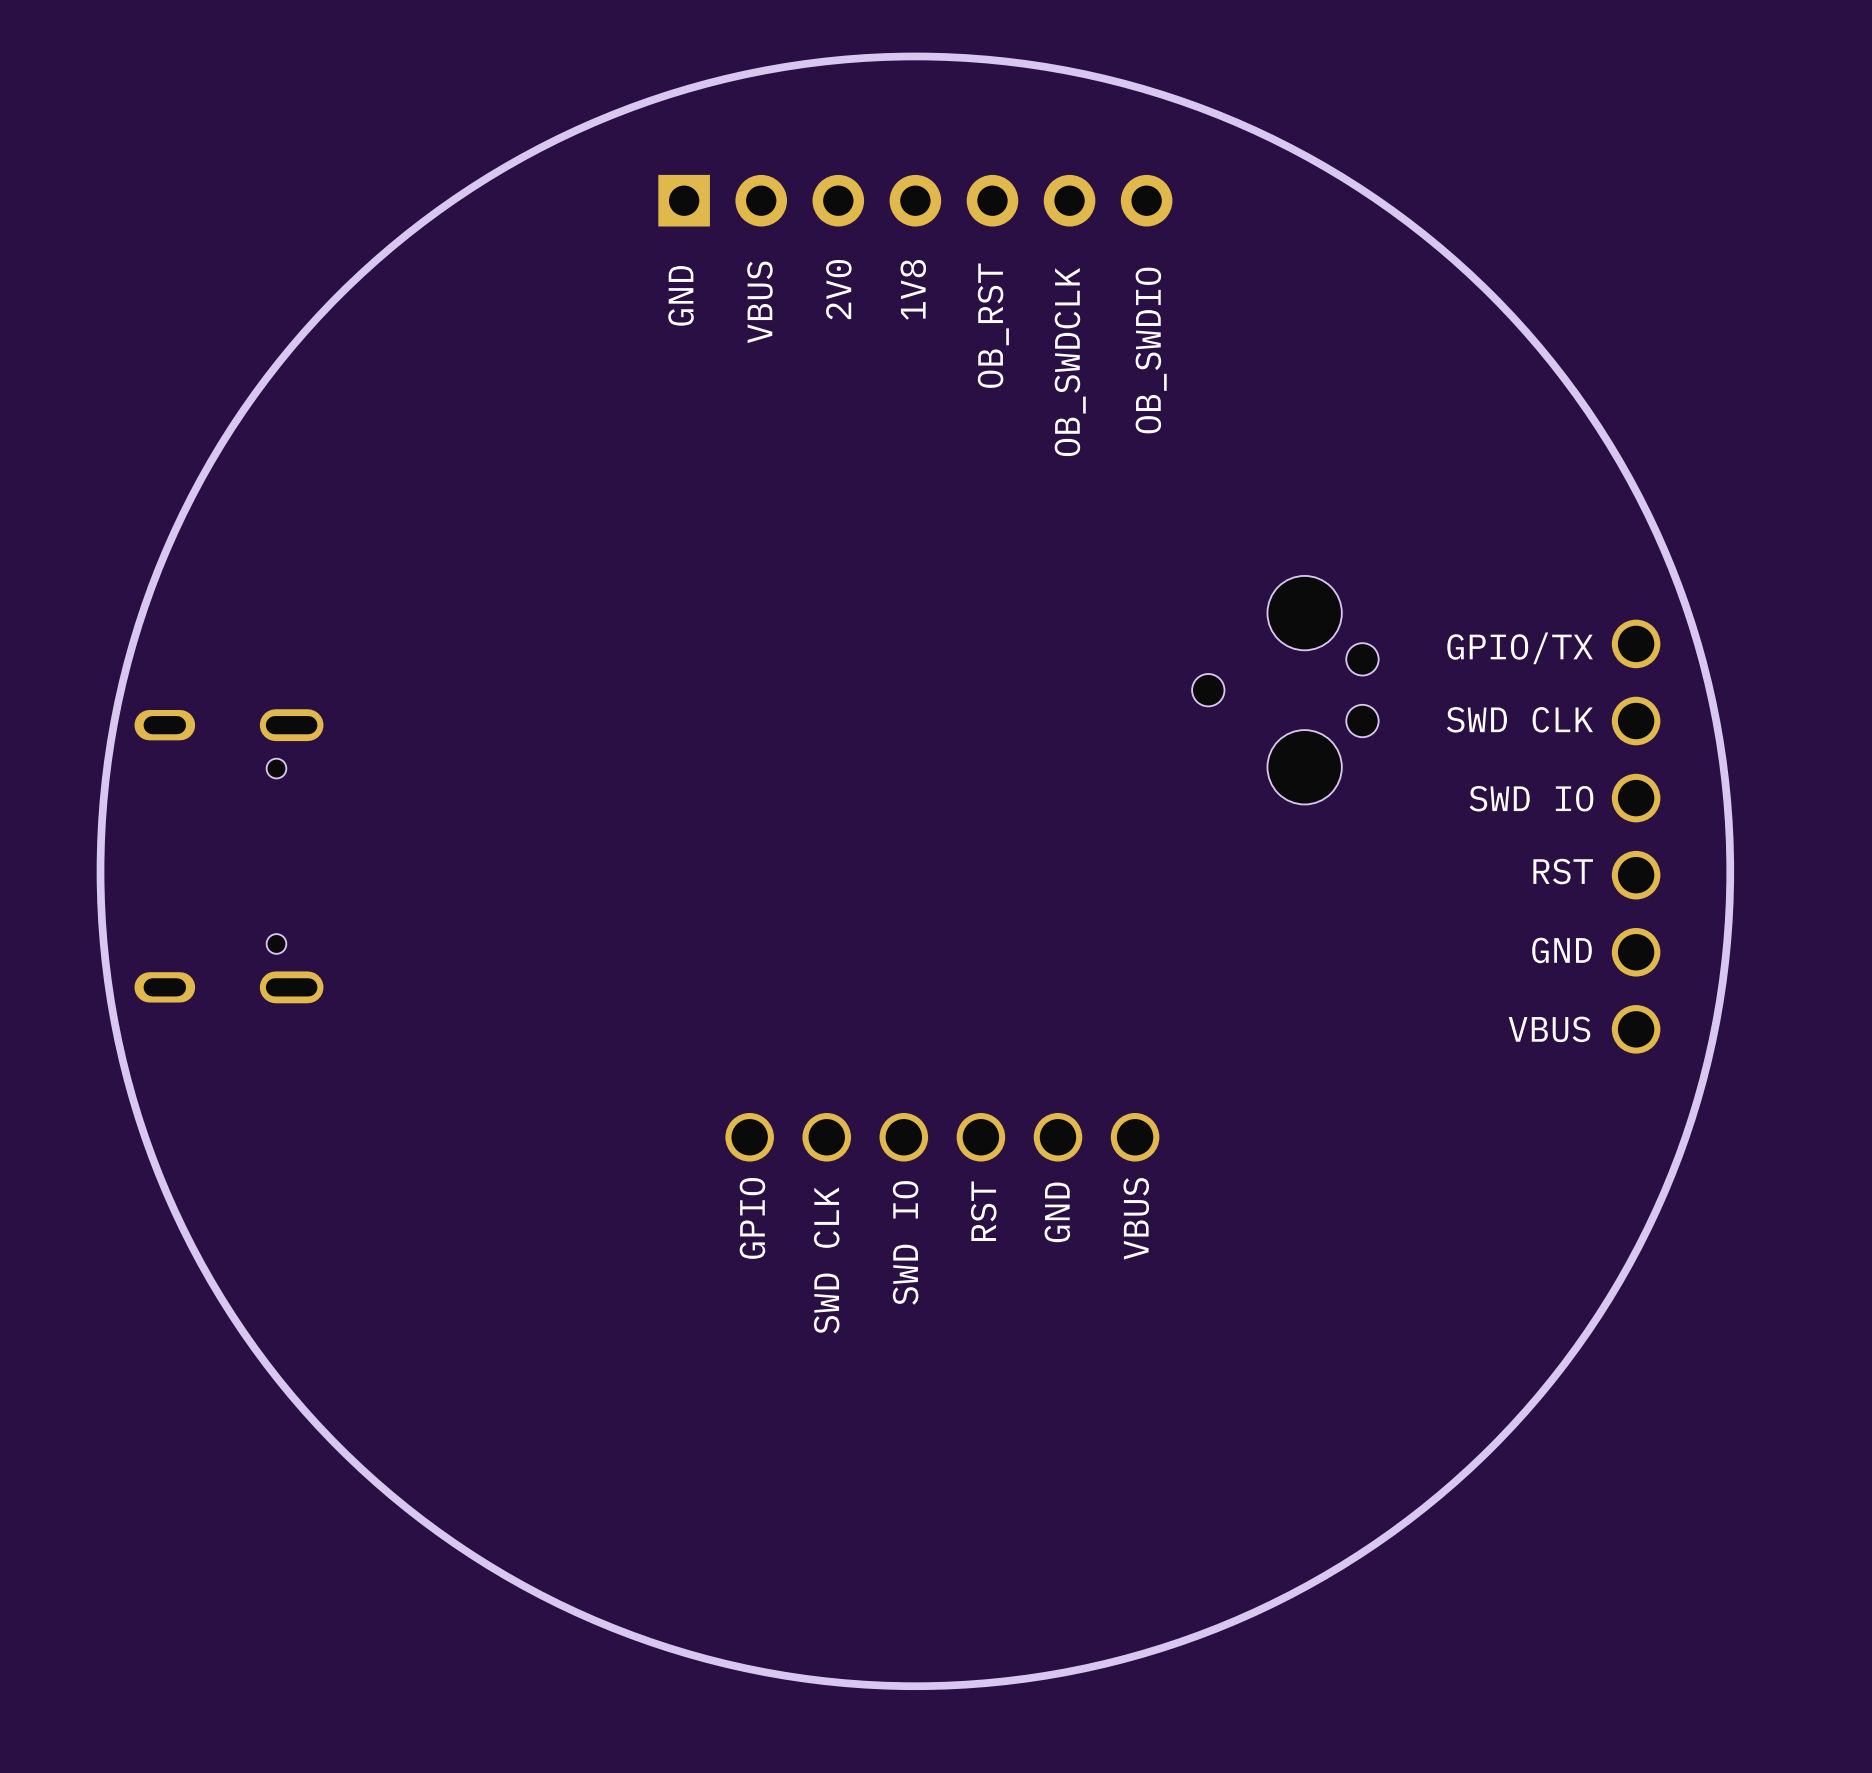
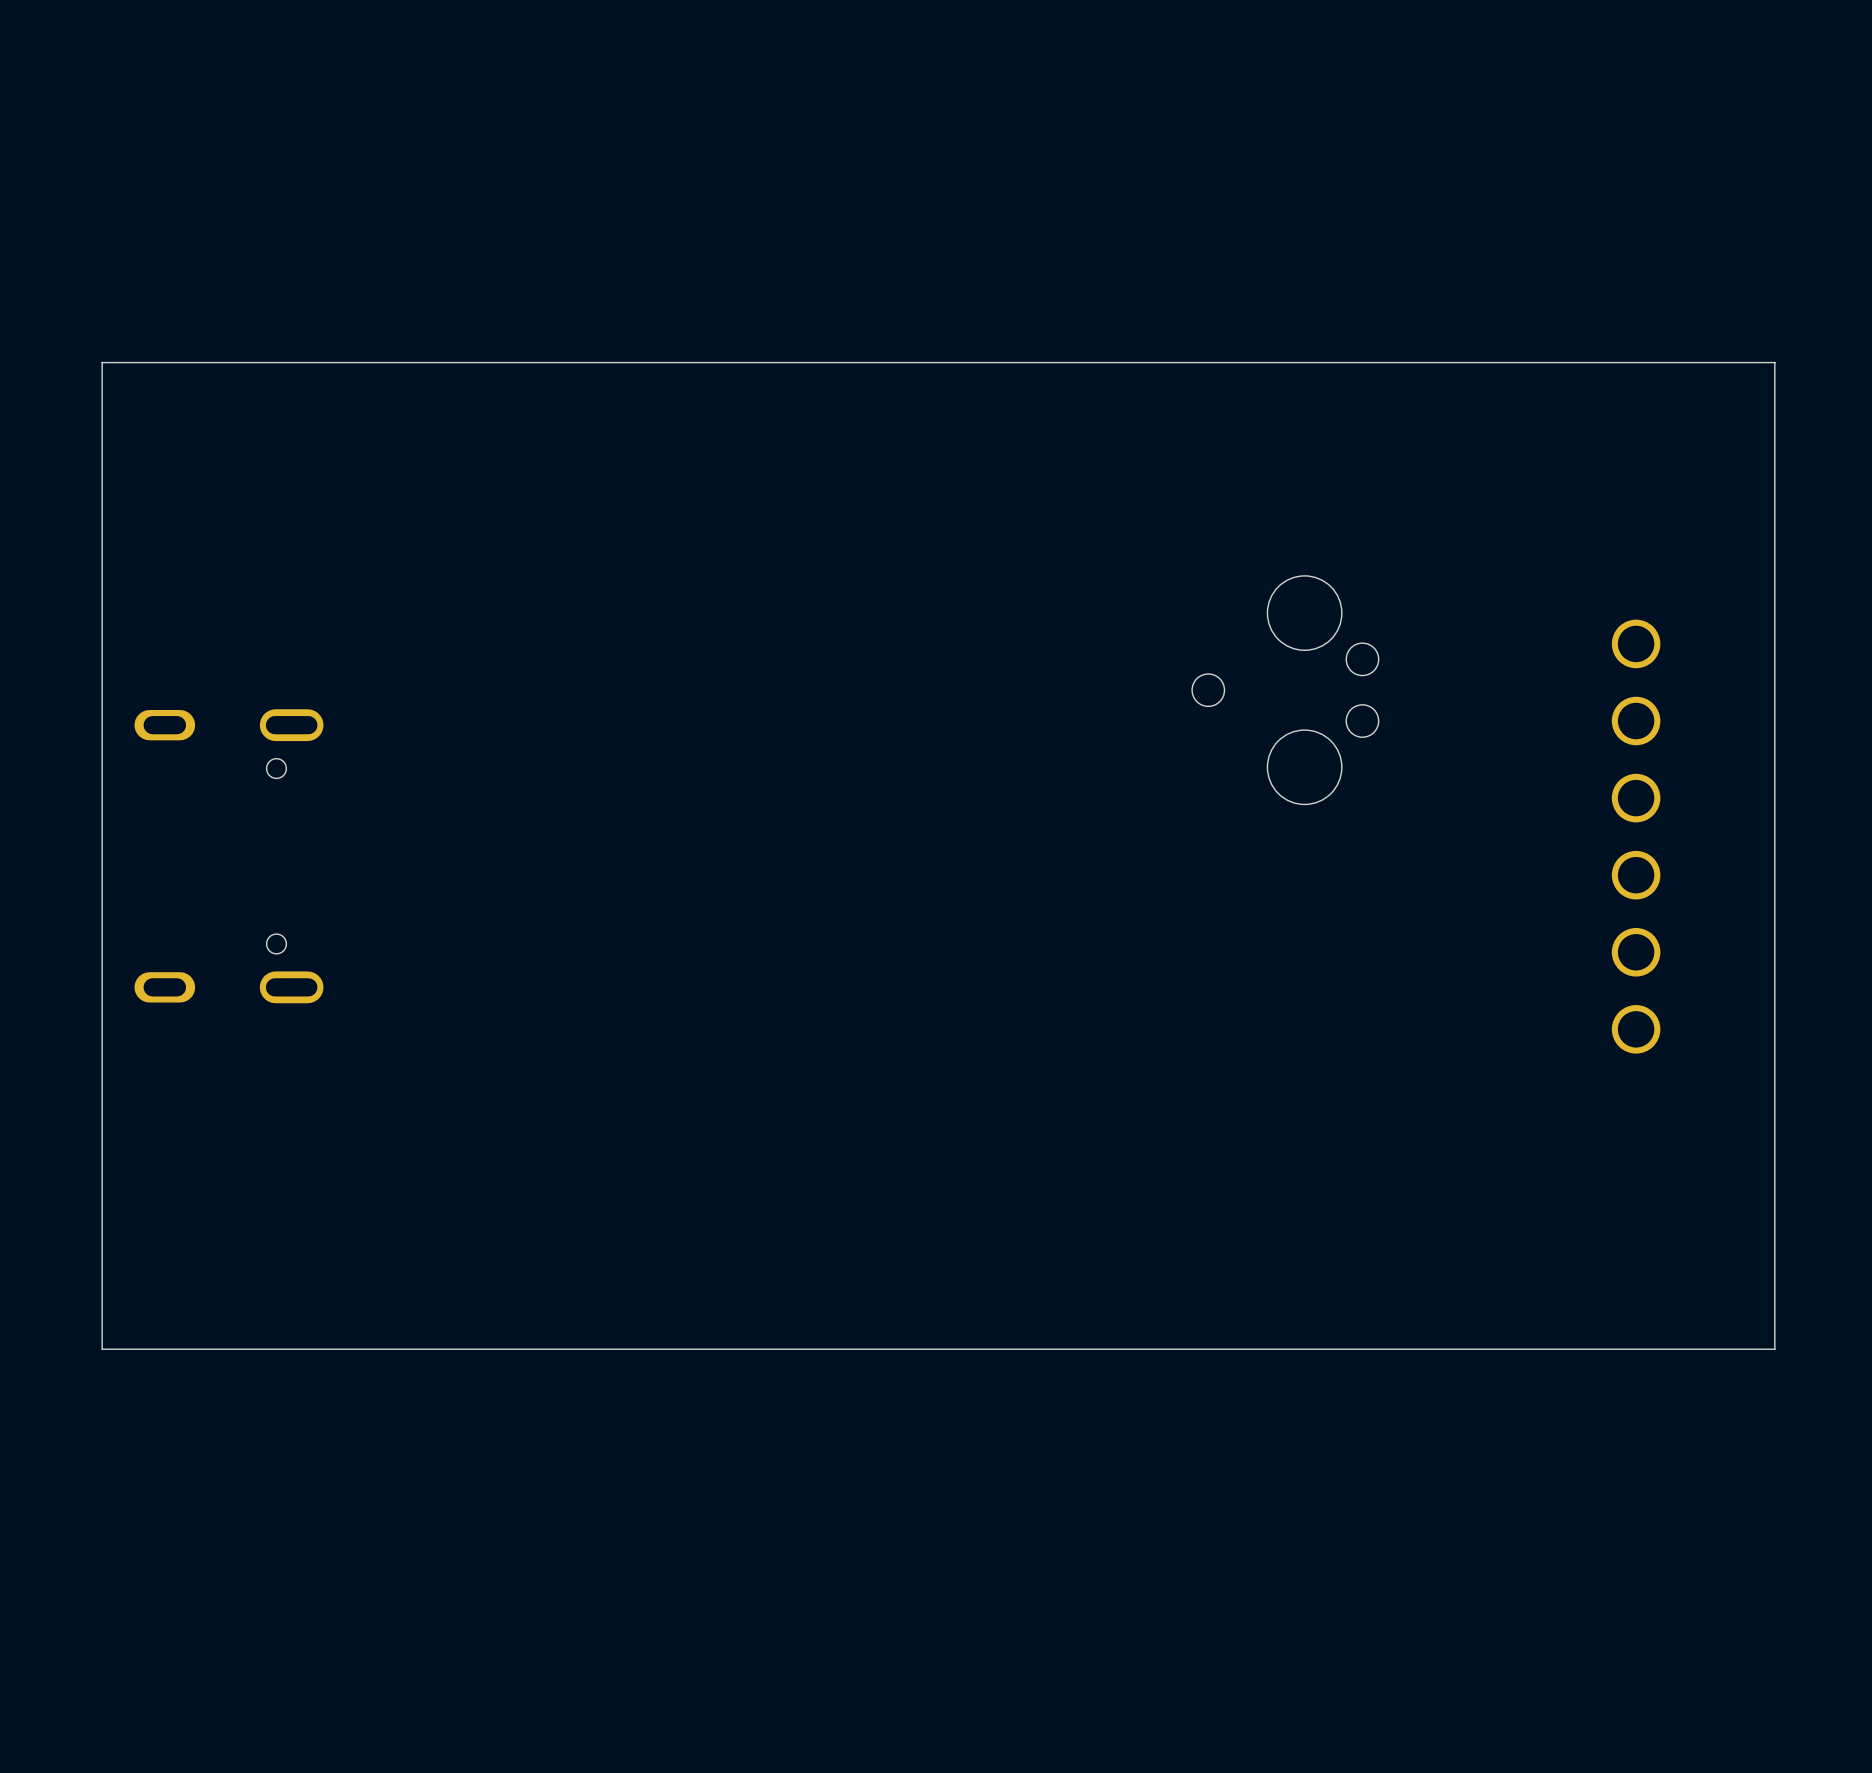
round board edge: [96, 52, 1735, 1691] -> none
part: (915, 200) -> none
text: 2V0 (838, 289) -> none
text: 1V8 (913, 289) -> none
text: GND (681, 295) -> none
text: VBUS (759, 302) -> none
text: OB_RST (993, 325) -> none
text: OB_SWDIO (1151, 350) -> none
text: OB_SWDCLK (1070, 362) -> none
board edge: none -> (1774, 362) (102, 362) (102, 1349) (1774, 1349) (1774, 362)
text: GPIO/TX (1520, 648) -> none
text: SWD CLK (1519, 719) -> none
text: SWD IO (1531, 798) -> none
text: RST (1563, 871) -> none
text: GND (1562, 950) -> none
text: VBUS (1549, 1029) -> none
part: (942, 1137) -> none
text: RST (983, 1211) -> none
text: GND (1057, 1212) -> none
text: GPIO (752, 1218) -> none
text: VBUS (1136, 1218) -> none
text: SWD IO (905, 1242) -> none
text: SWD CLK (826, 1260) -> none

